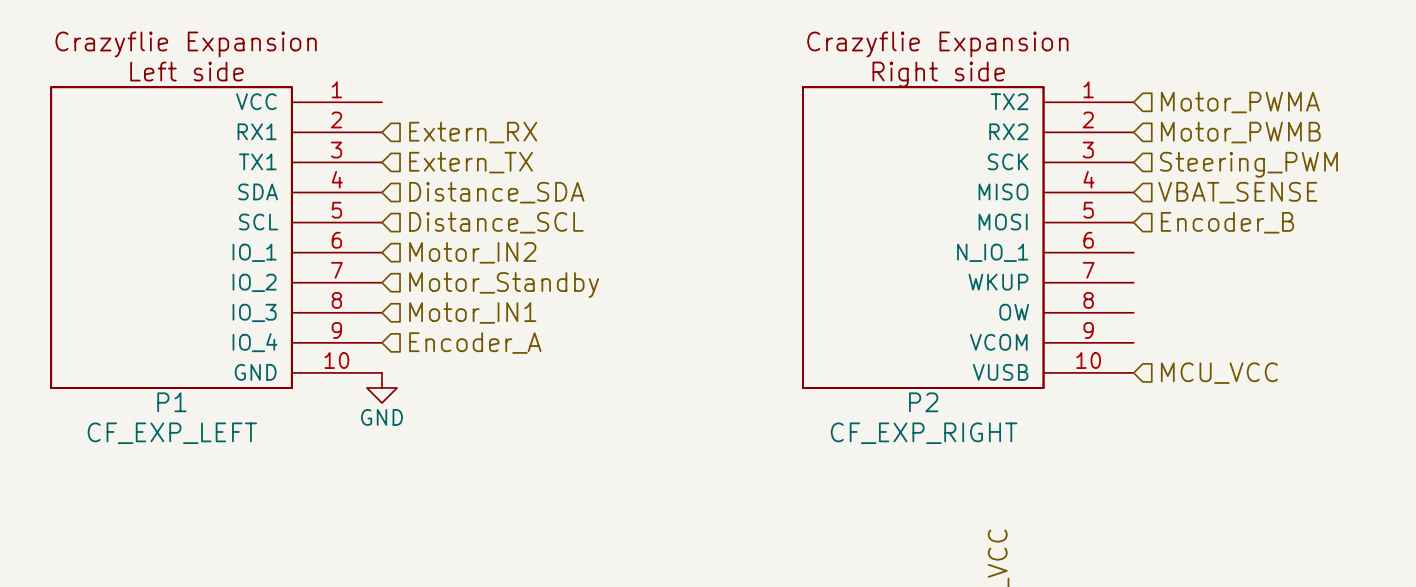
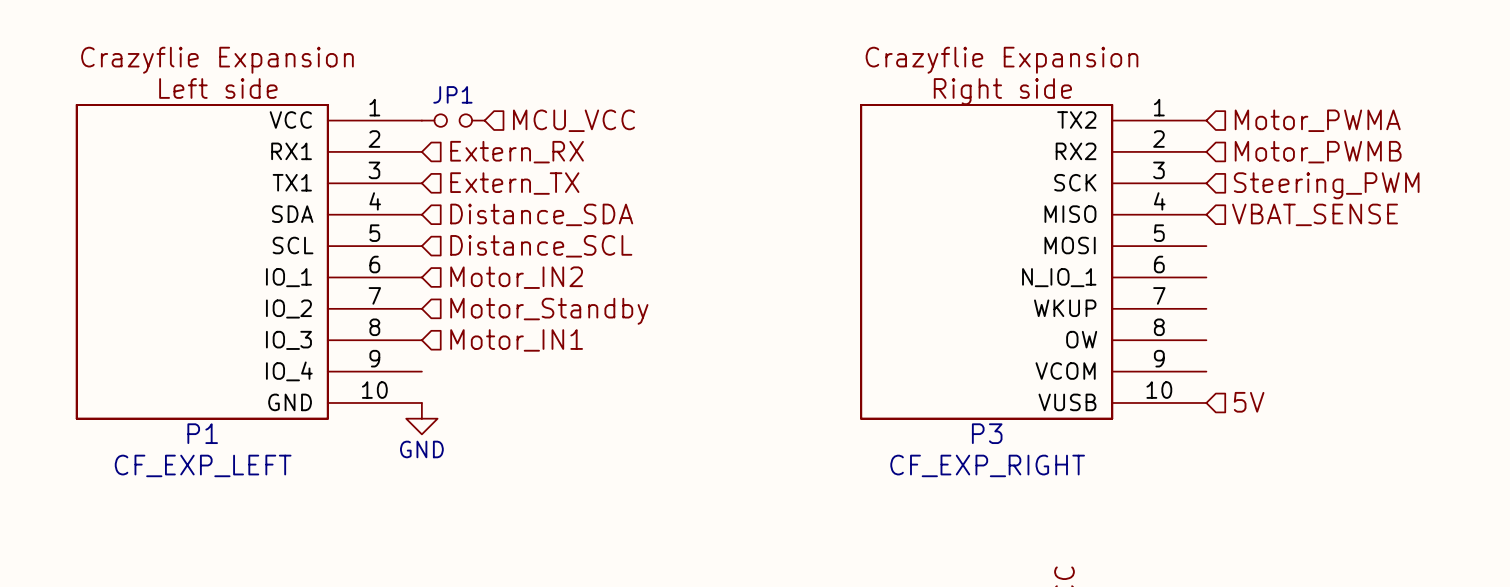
JP1: none -> (453, 120)
hierarchical label: none -> MCU_VCC (573, 120)
hierarchical label: Encoder_B (1227, 222) -> none
hierarchical label: Encoder_A (475, 343) -> none
hierarchical label: MCU_VCC (1219, 373) -> 5V (1249, 402)
P2 name: P2 (923, 402) -> P3 (987, 433)

